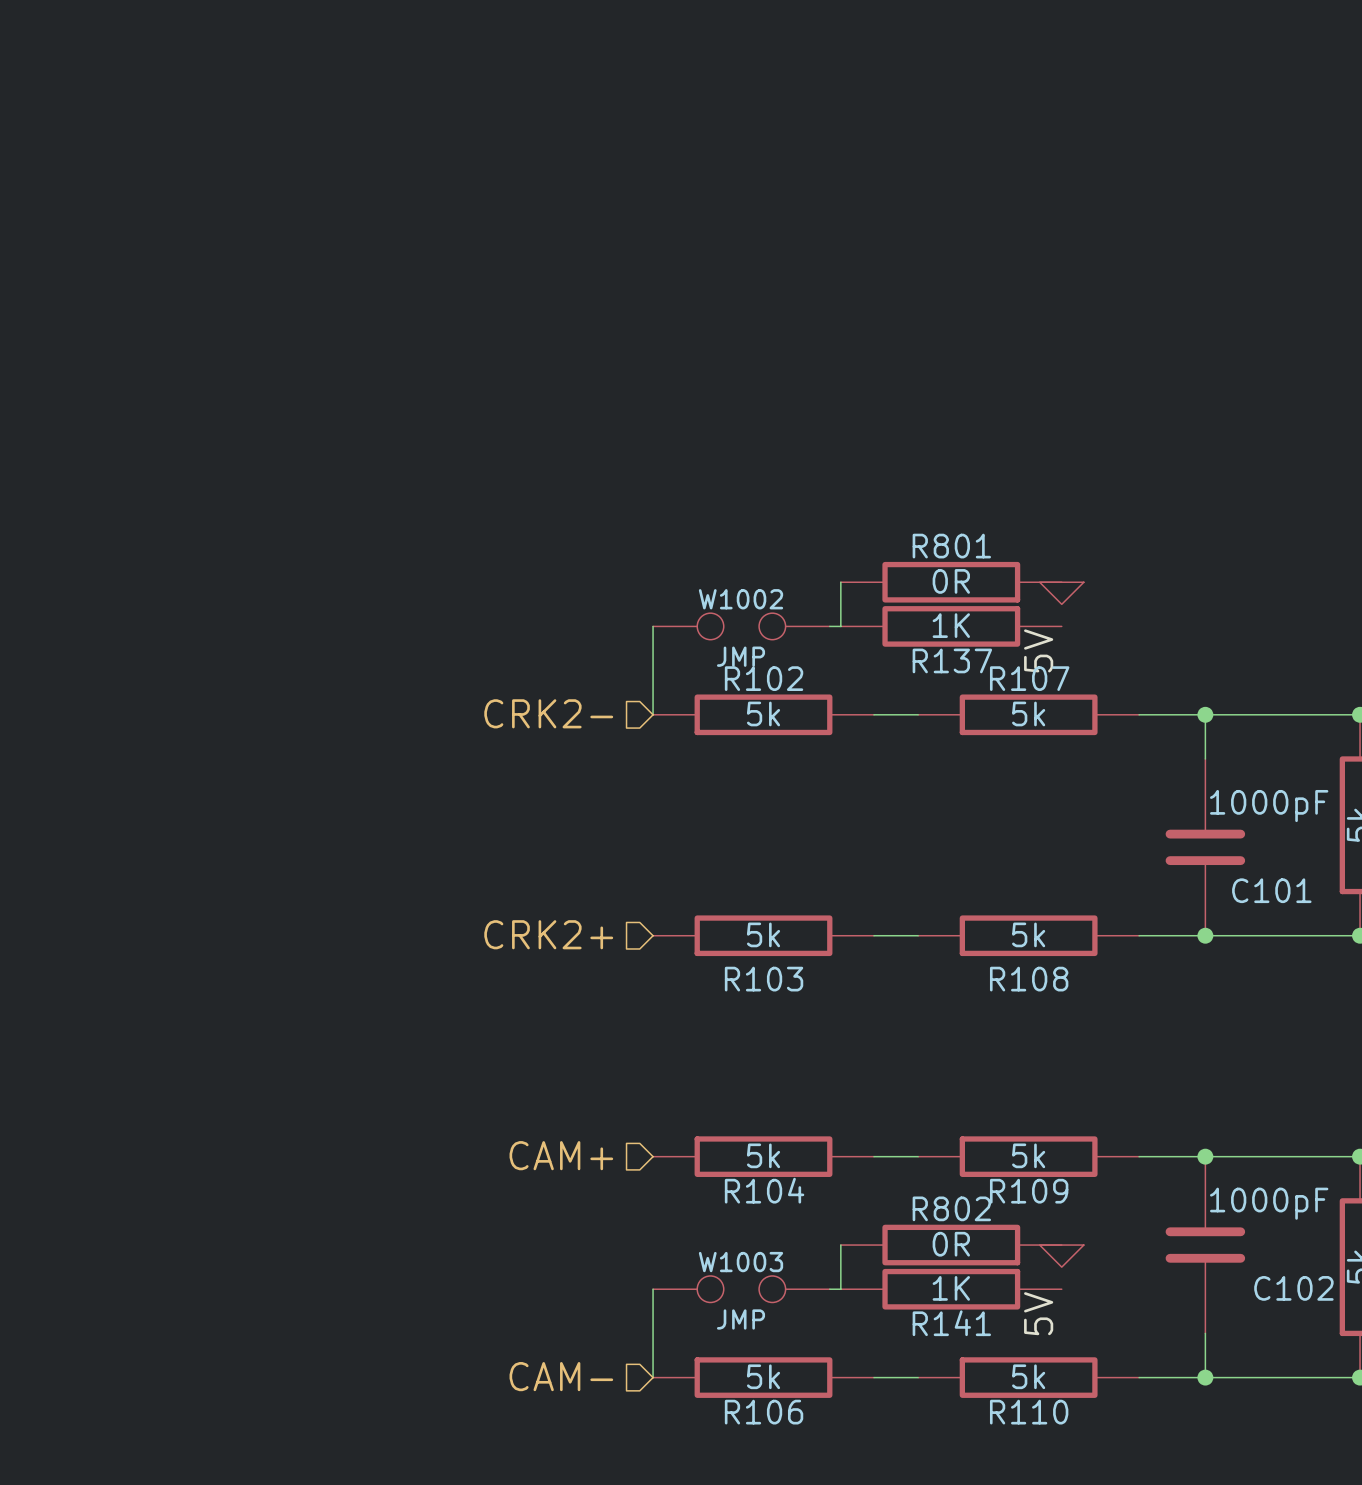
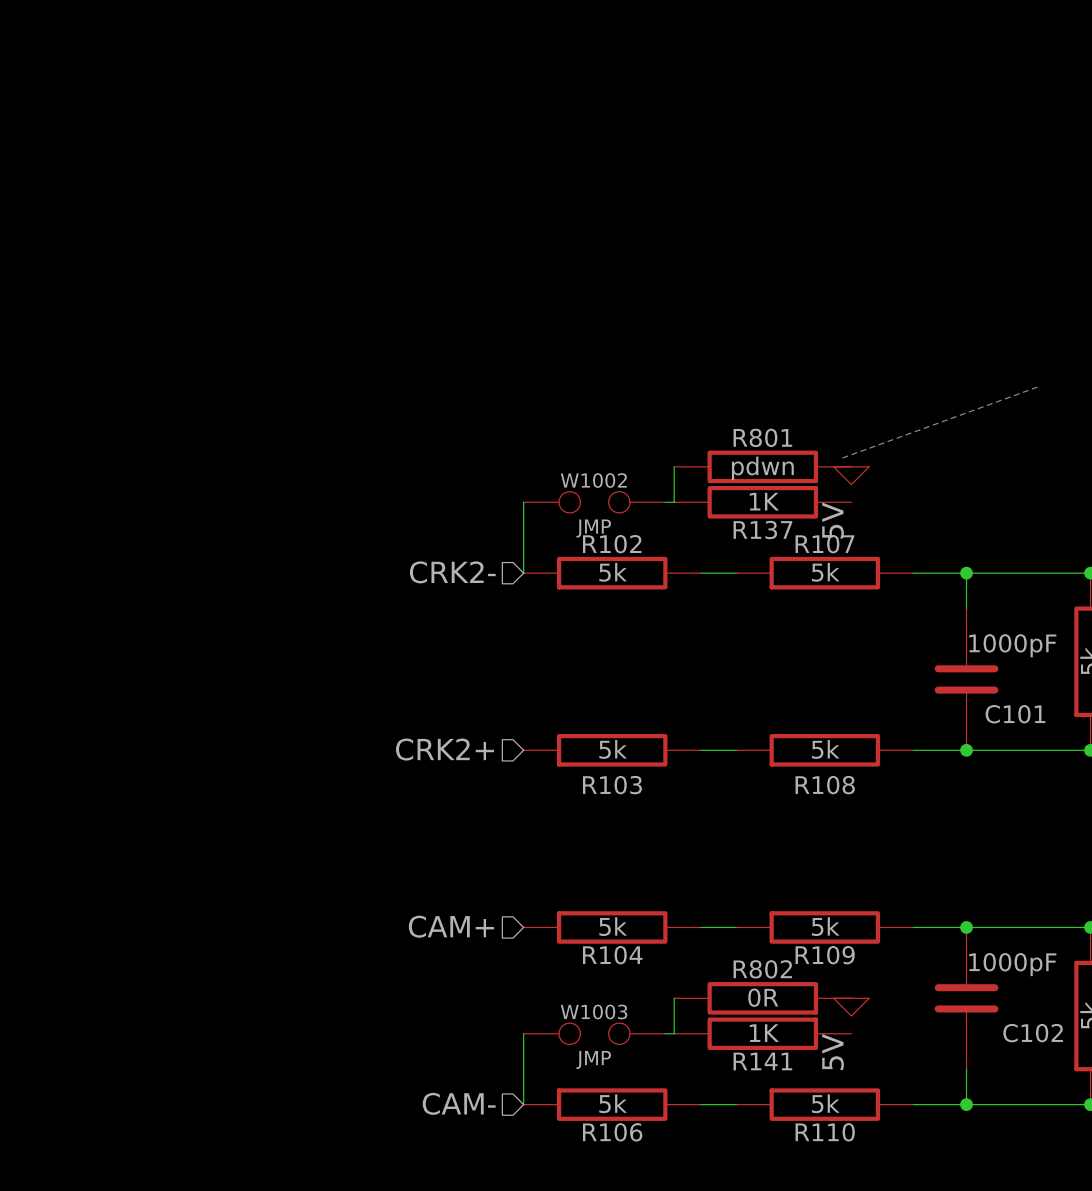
line: none -> (1037, 387) (842, 458)
R801 value: 0R (951, 581) -> pdwn (762, 468)

